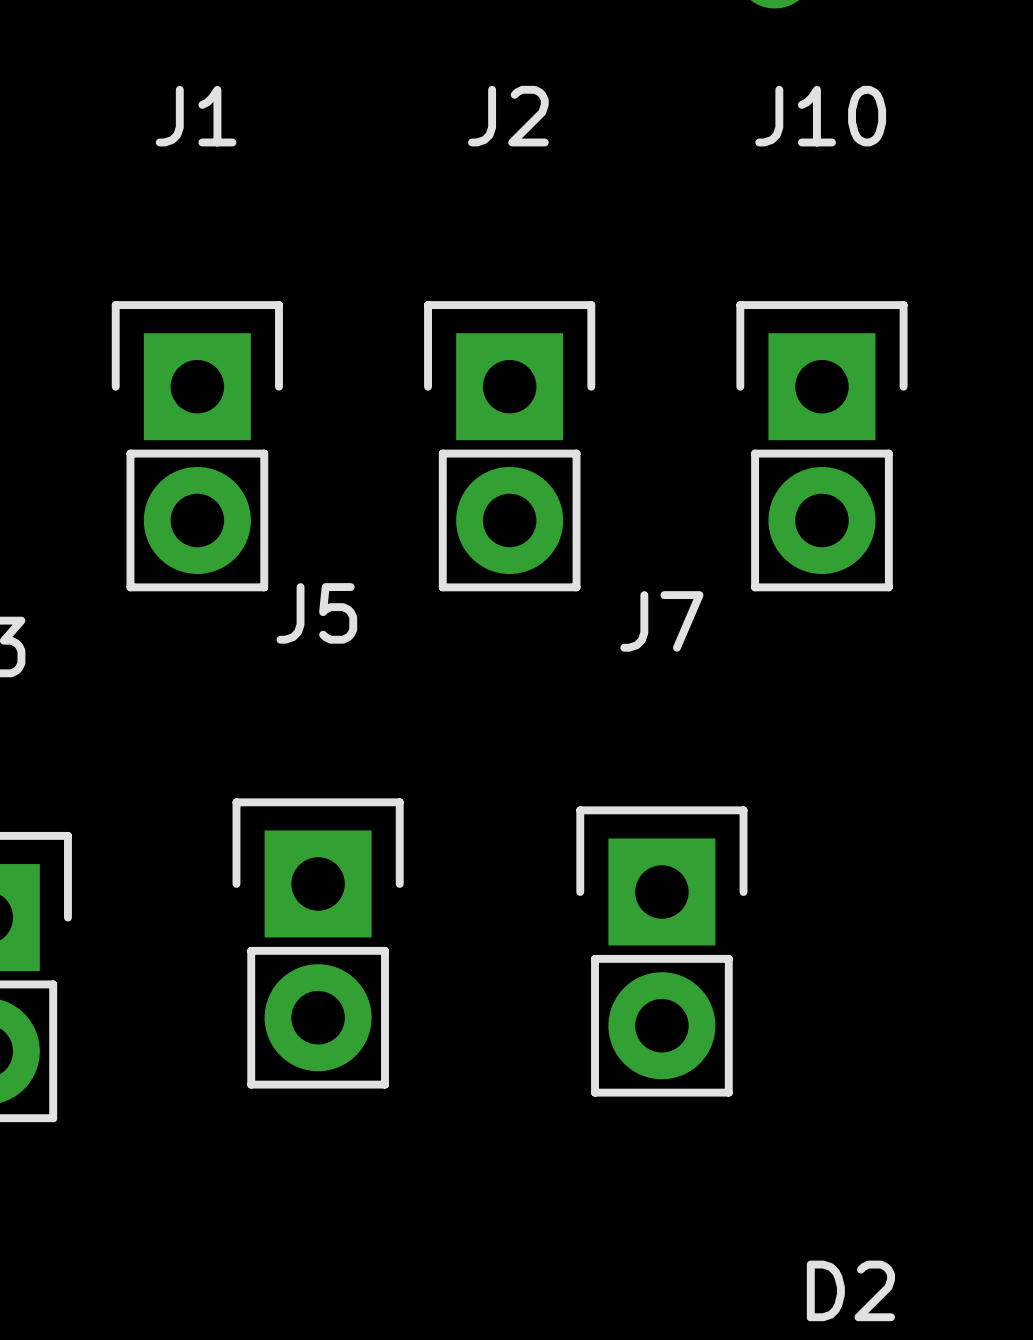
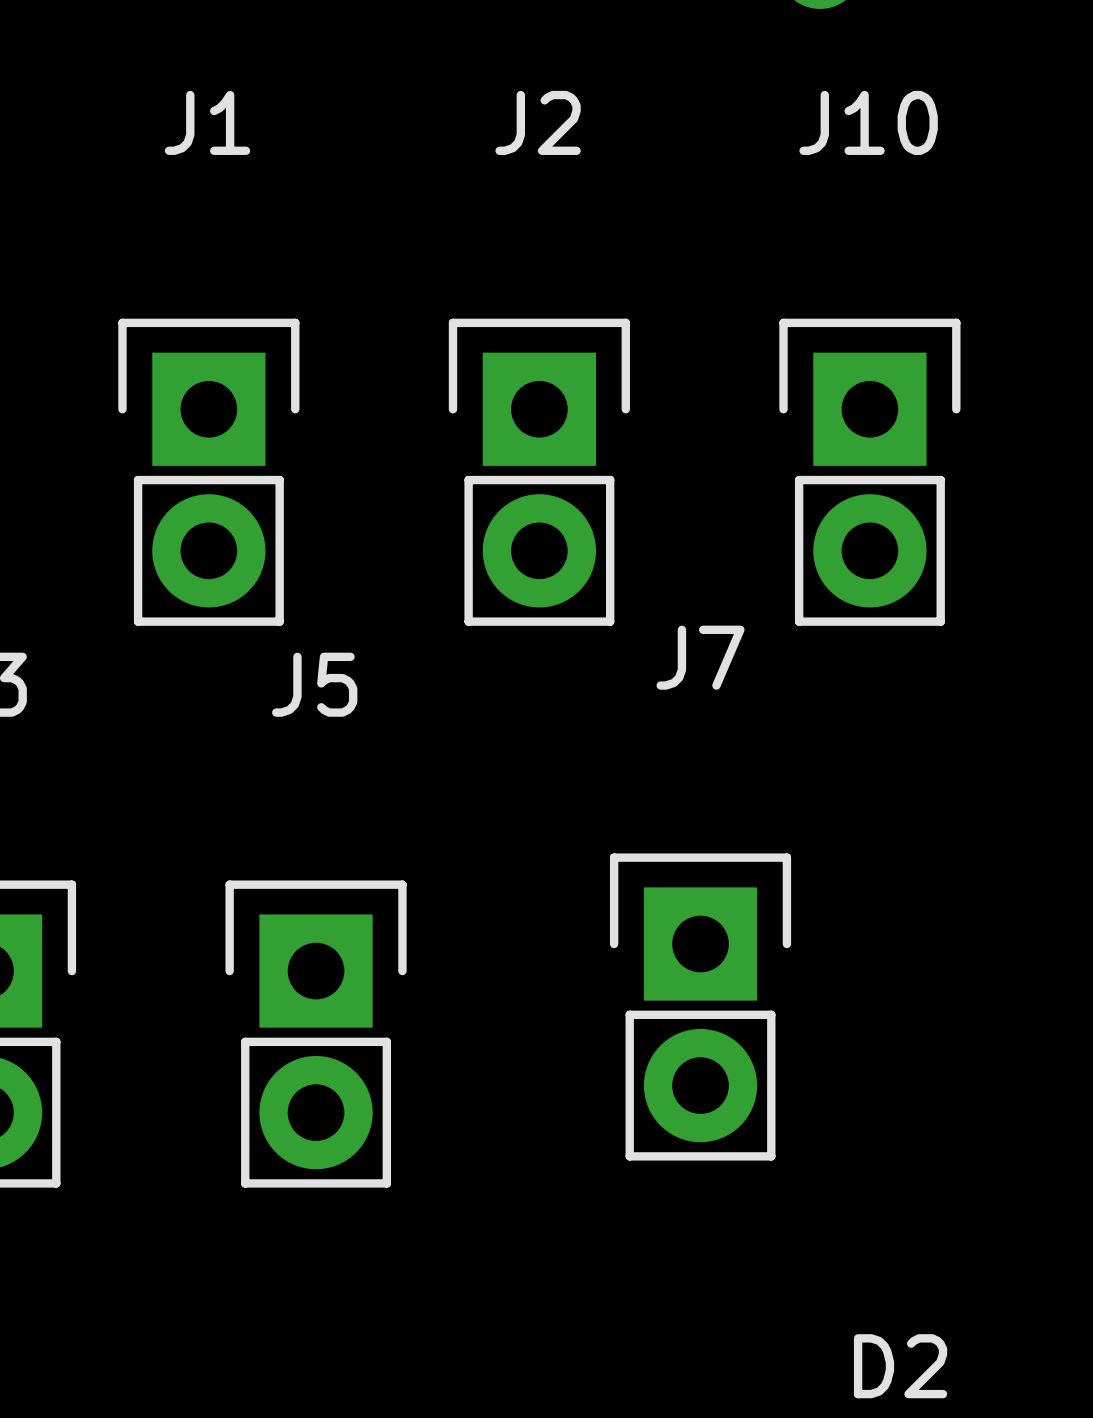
J5 position: (318, 943) -> (316, 1034)

